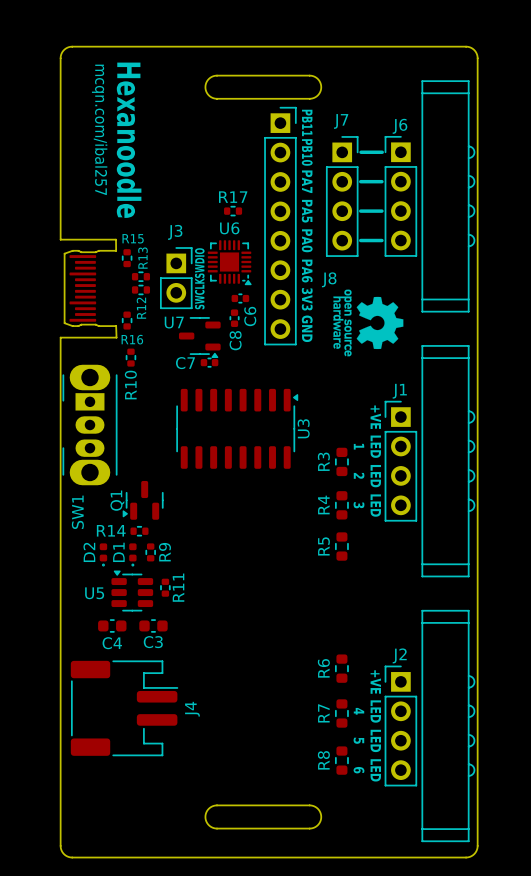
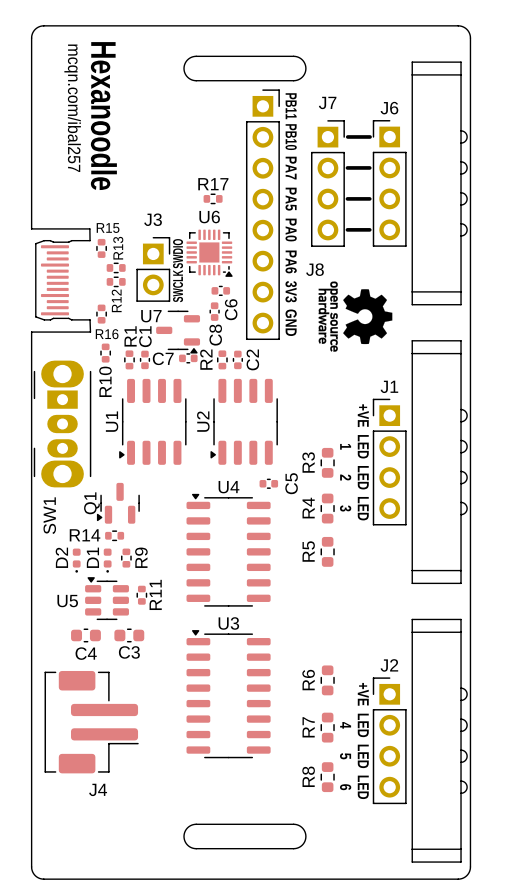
R1: none -> (129, 359)
C1: none -> (144, 359)
R2: none -> (222, 359)
C2: none -> (237, 359)
U1: none -> (152, 421)
U2: none -> (244, 421)
U3 rotation: 0° (237, 428) -> 90° counterclockwise (228, 694)
U3 position: (237, 428) -> (228, 694)
C5: none -> (268, 483)
U4: none -> (228, 550)
J4 footprint: [70, 660, 179, 757] -> [44, 670, 139, 774]
J4 name position: J4 (192, 709) -> J4 (98, 789)

